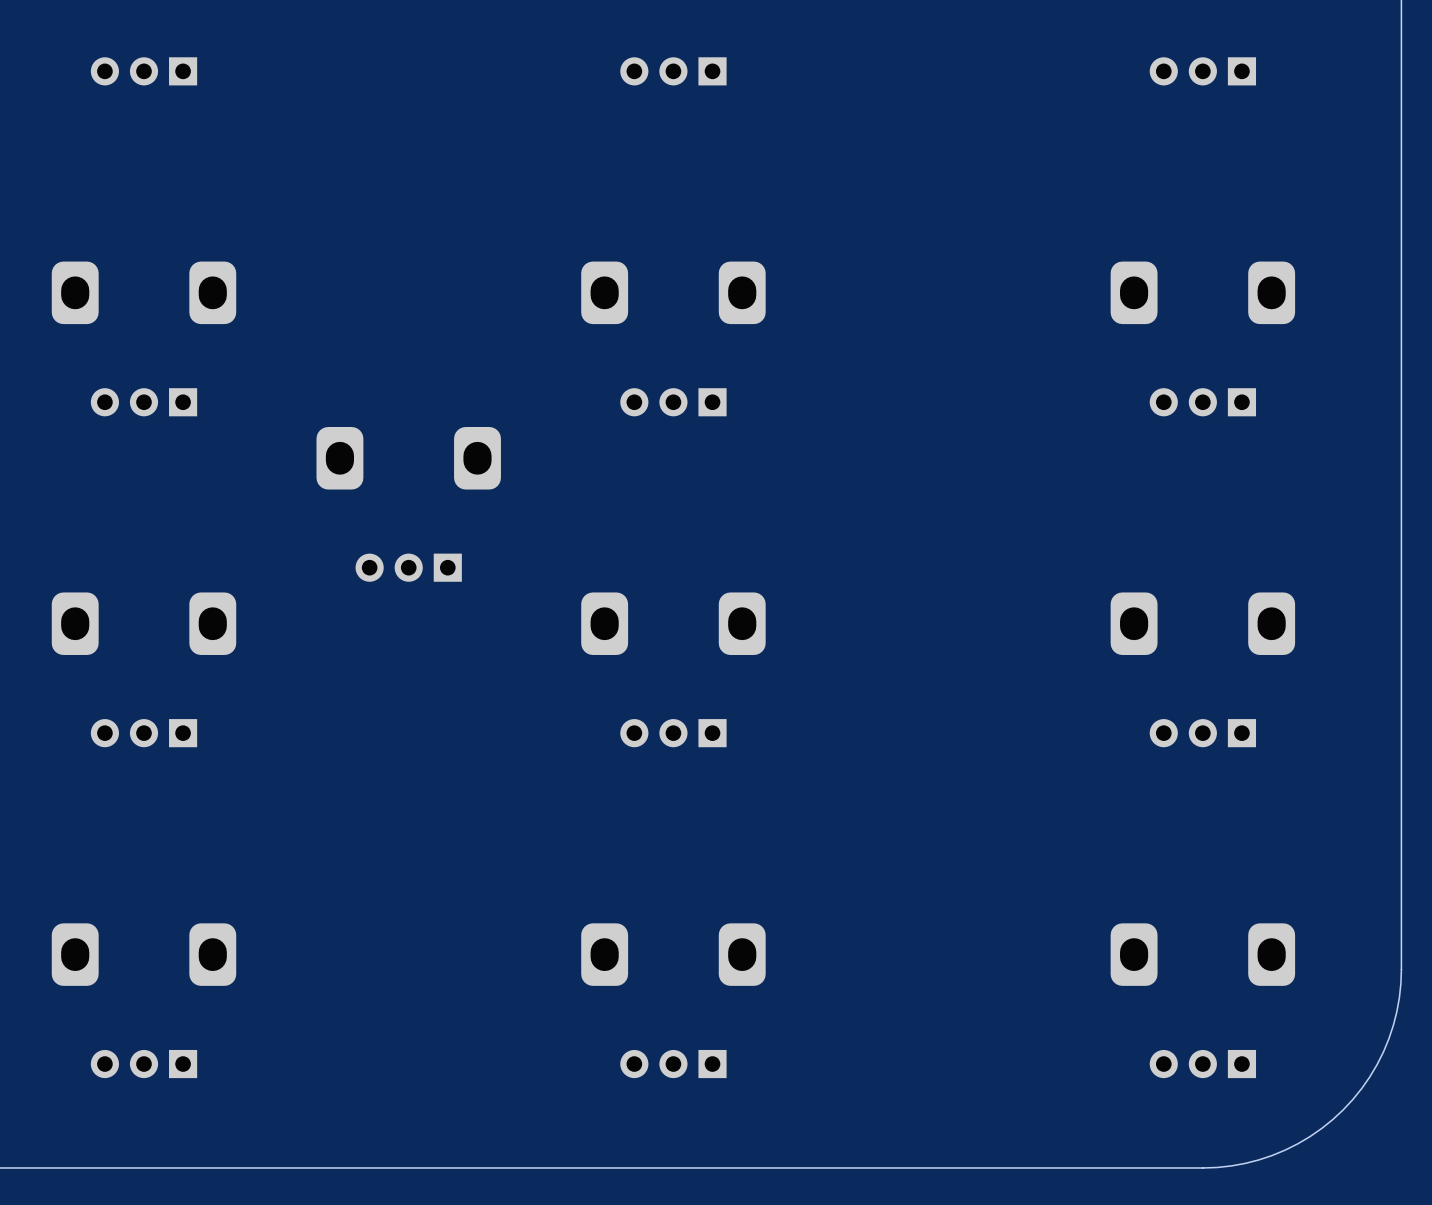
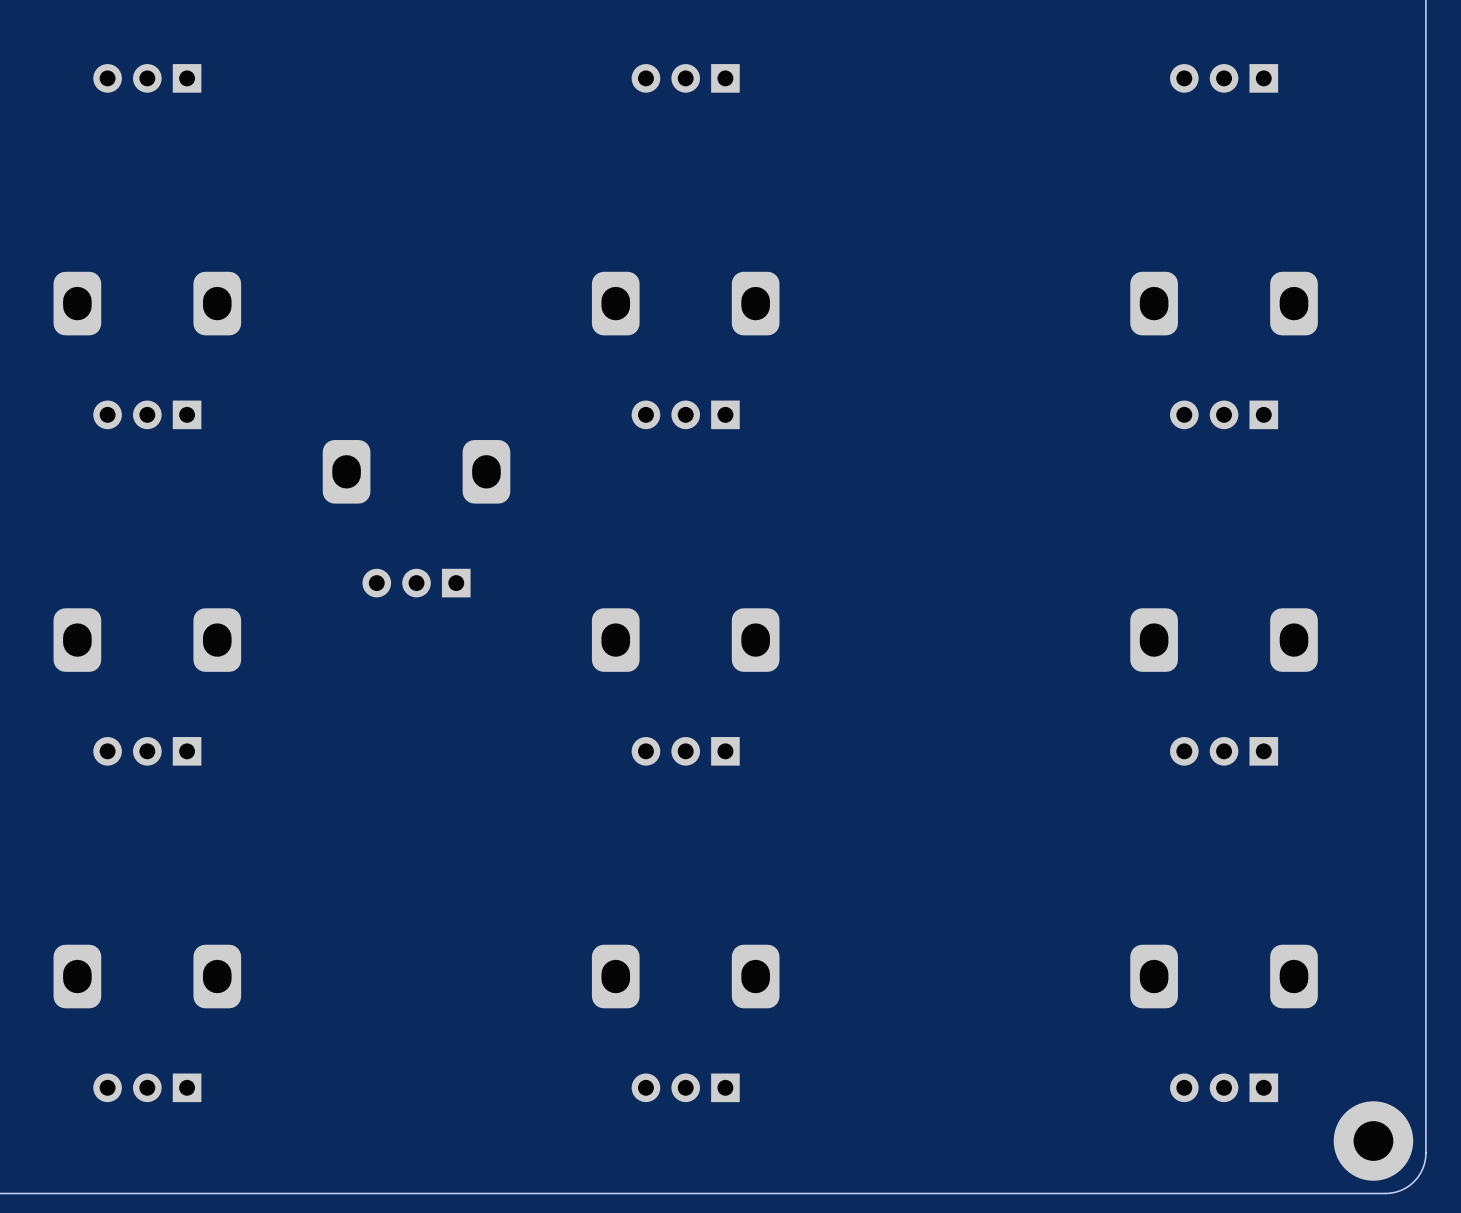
board edge: (1401, 969) (1396, 1011) (1388, 1038) (1369, 1076) (1343, 1109) (1310, 1136) (1285, 1150) (1245, 1163) (1202, 1167) -> (1425, 991) (1425, 1153) (1422, 1168) (1414, 1181) (1401, 1190) (1385, 1193) (1224, 1193)
part: none -> (1373, 1141)

